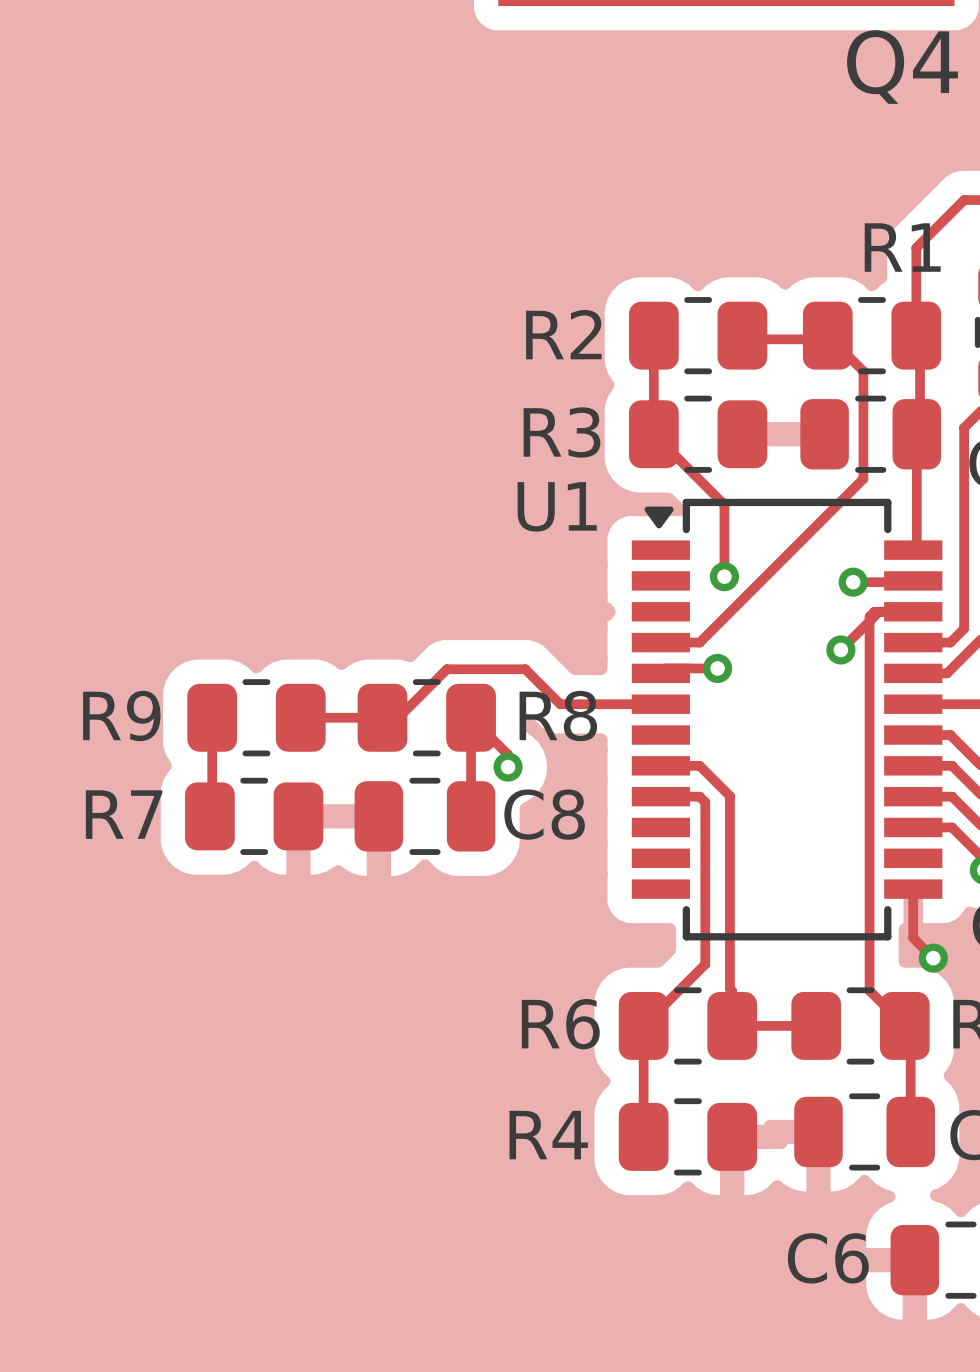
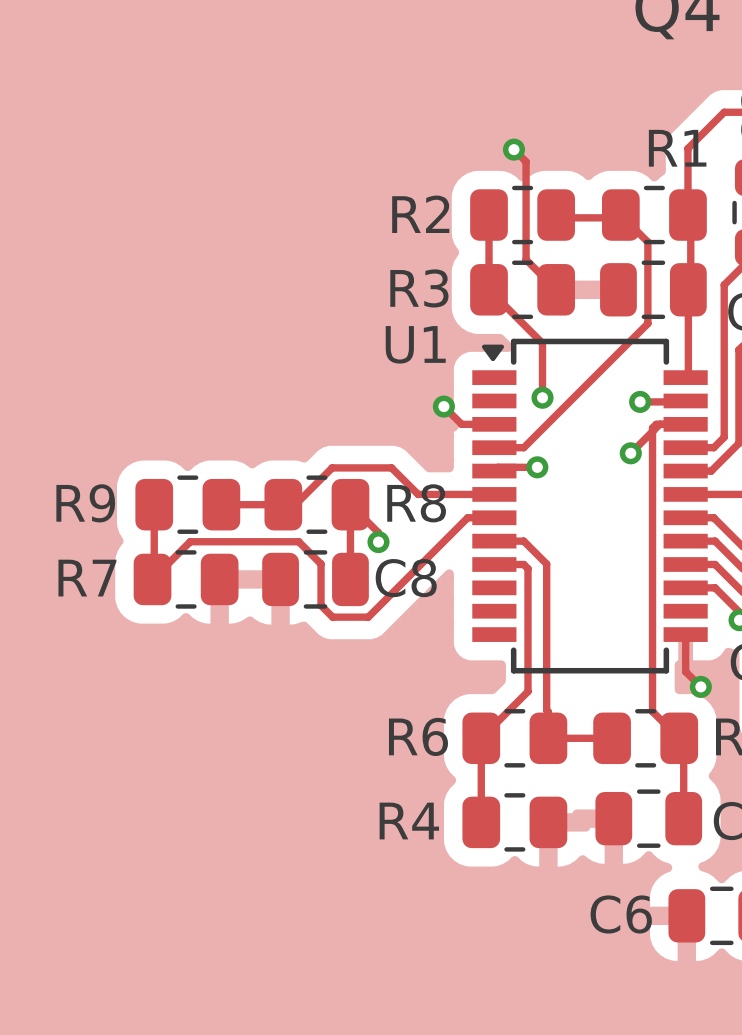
track: none -> (513, 149) (526, 161) (526, 259) (556, 289)
via: none -> (513, 149)
track: none -> (443, 406) (461, 424) (494, 424)
via: none -> (443, 406)
track: none -> (494, 517) (467, 517) (368, 617) (332, 617) (321, 605) (321, 564) (298, 541) (190, 541) (154, 577)

